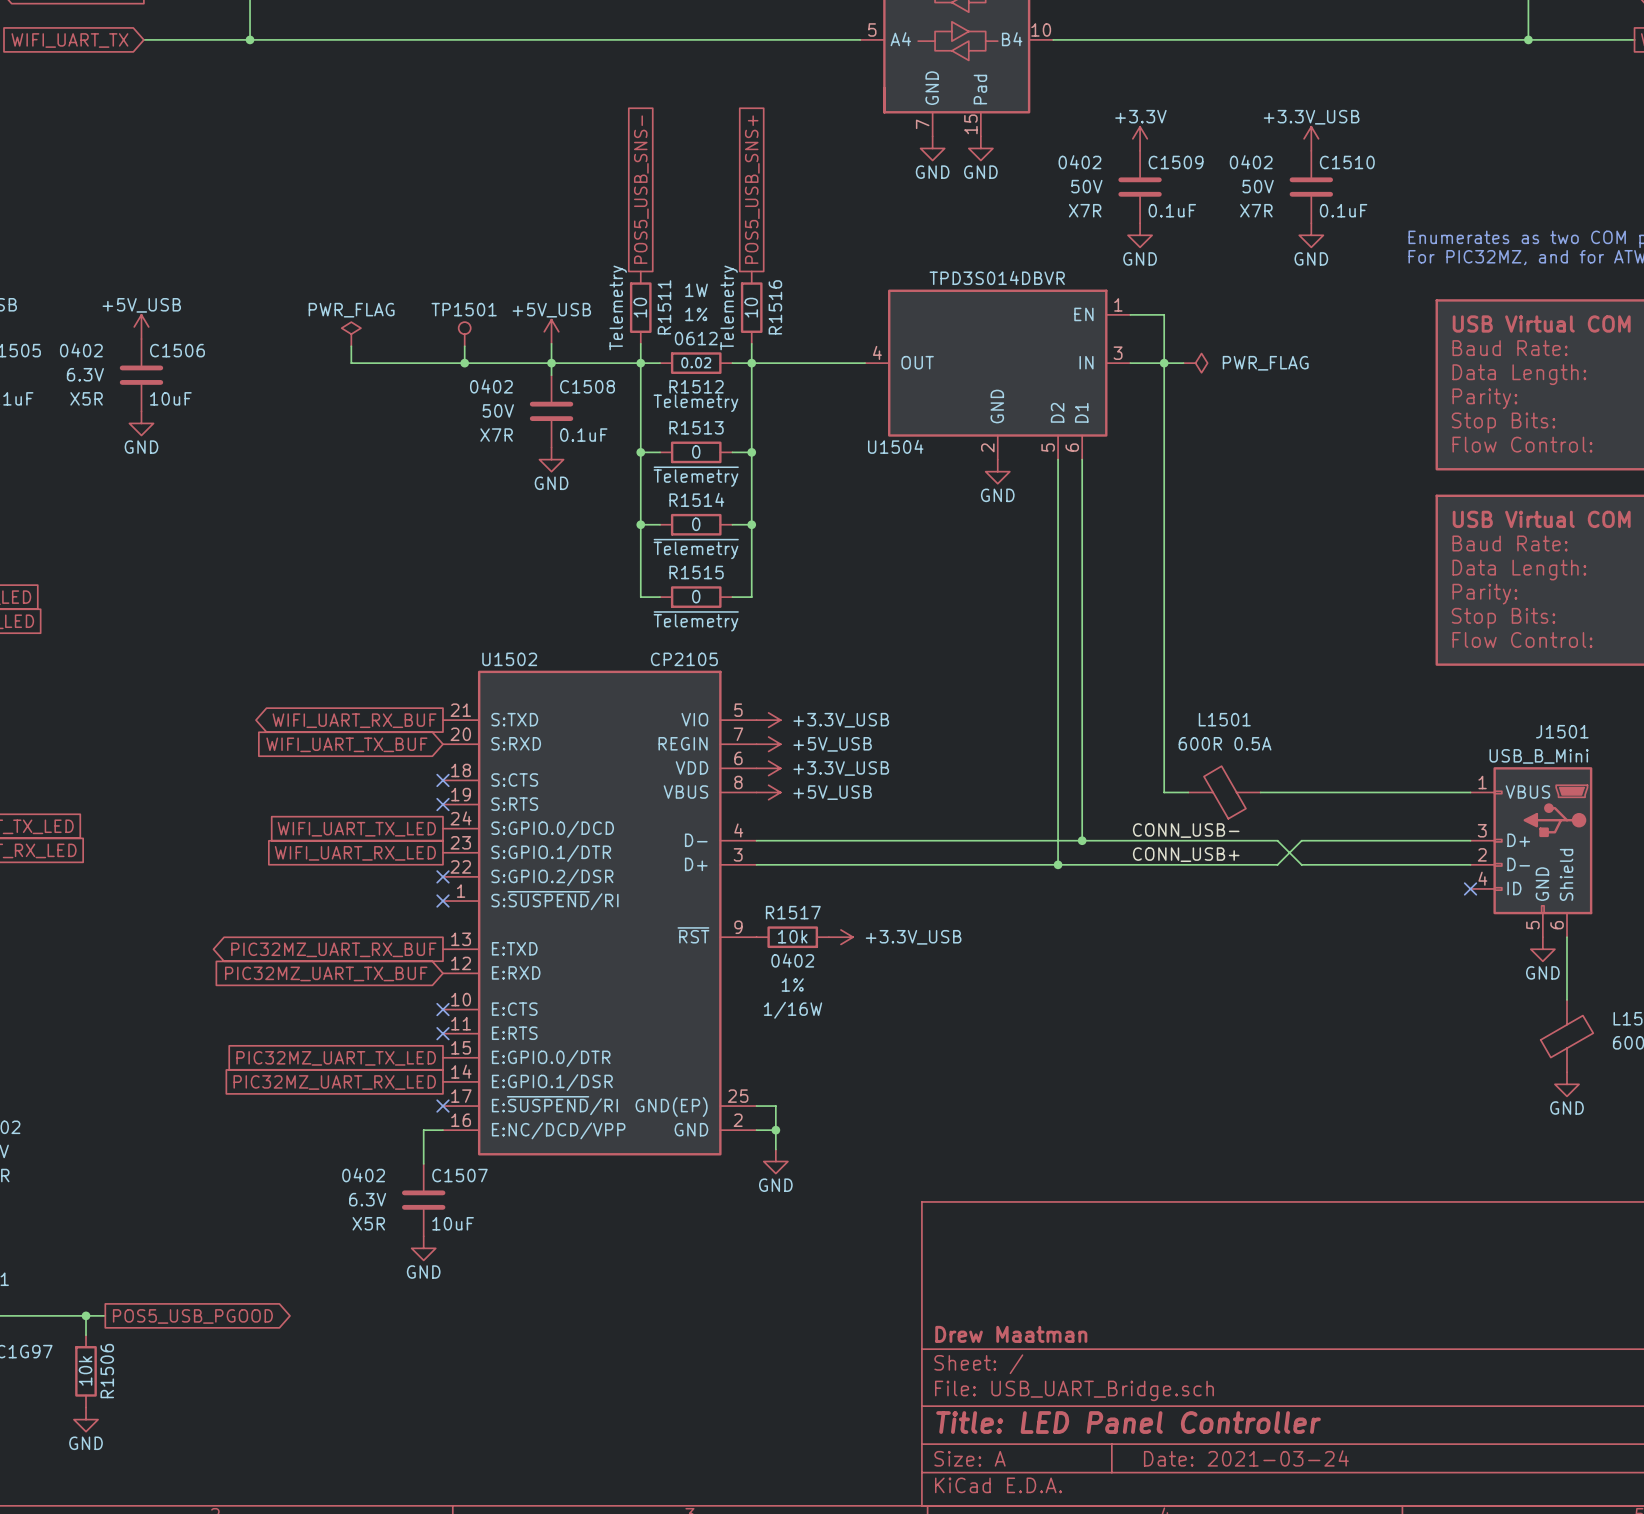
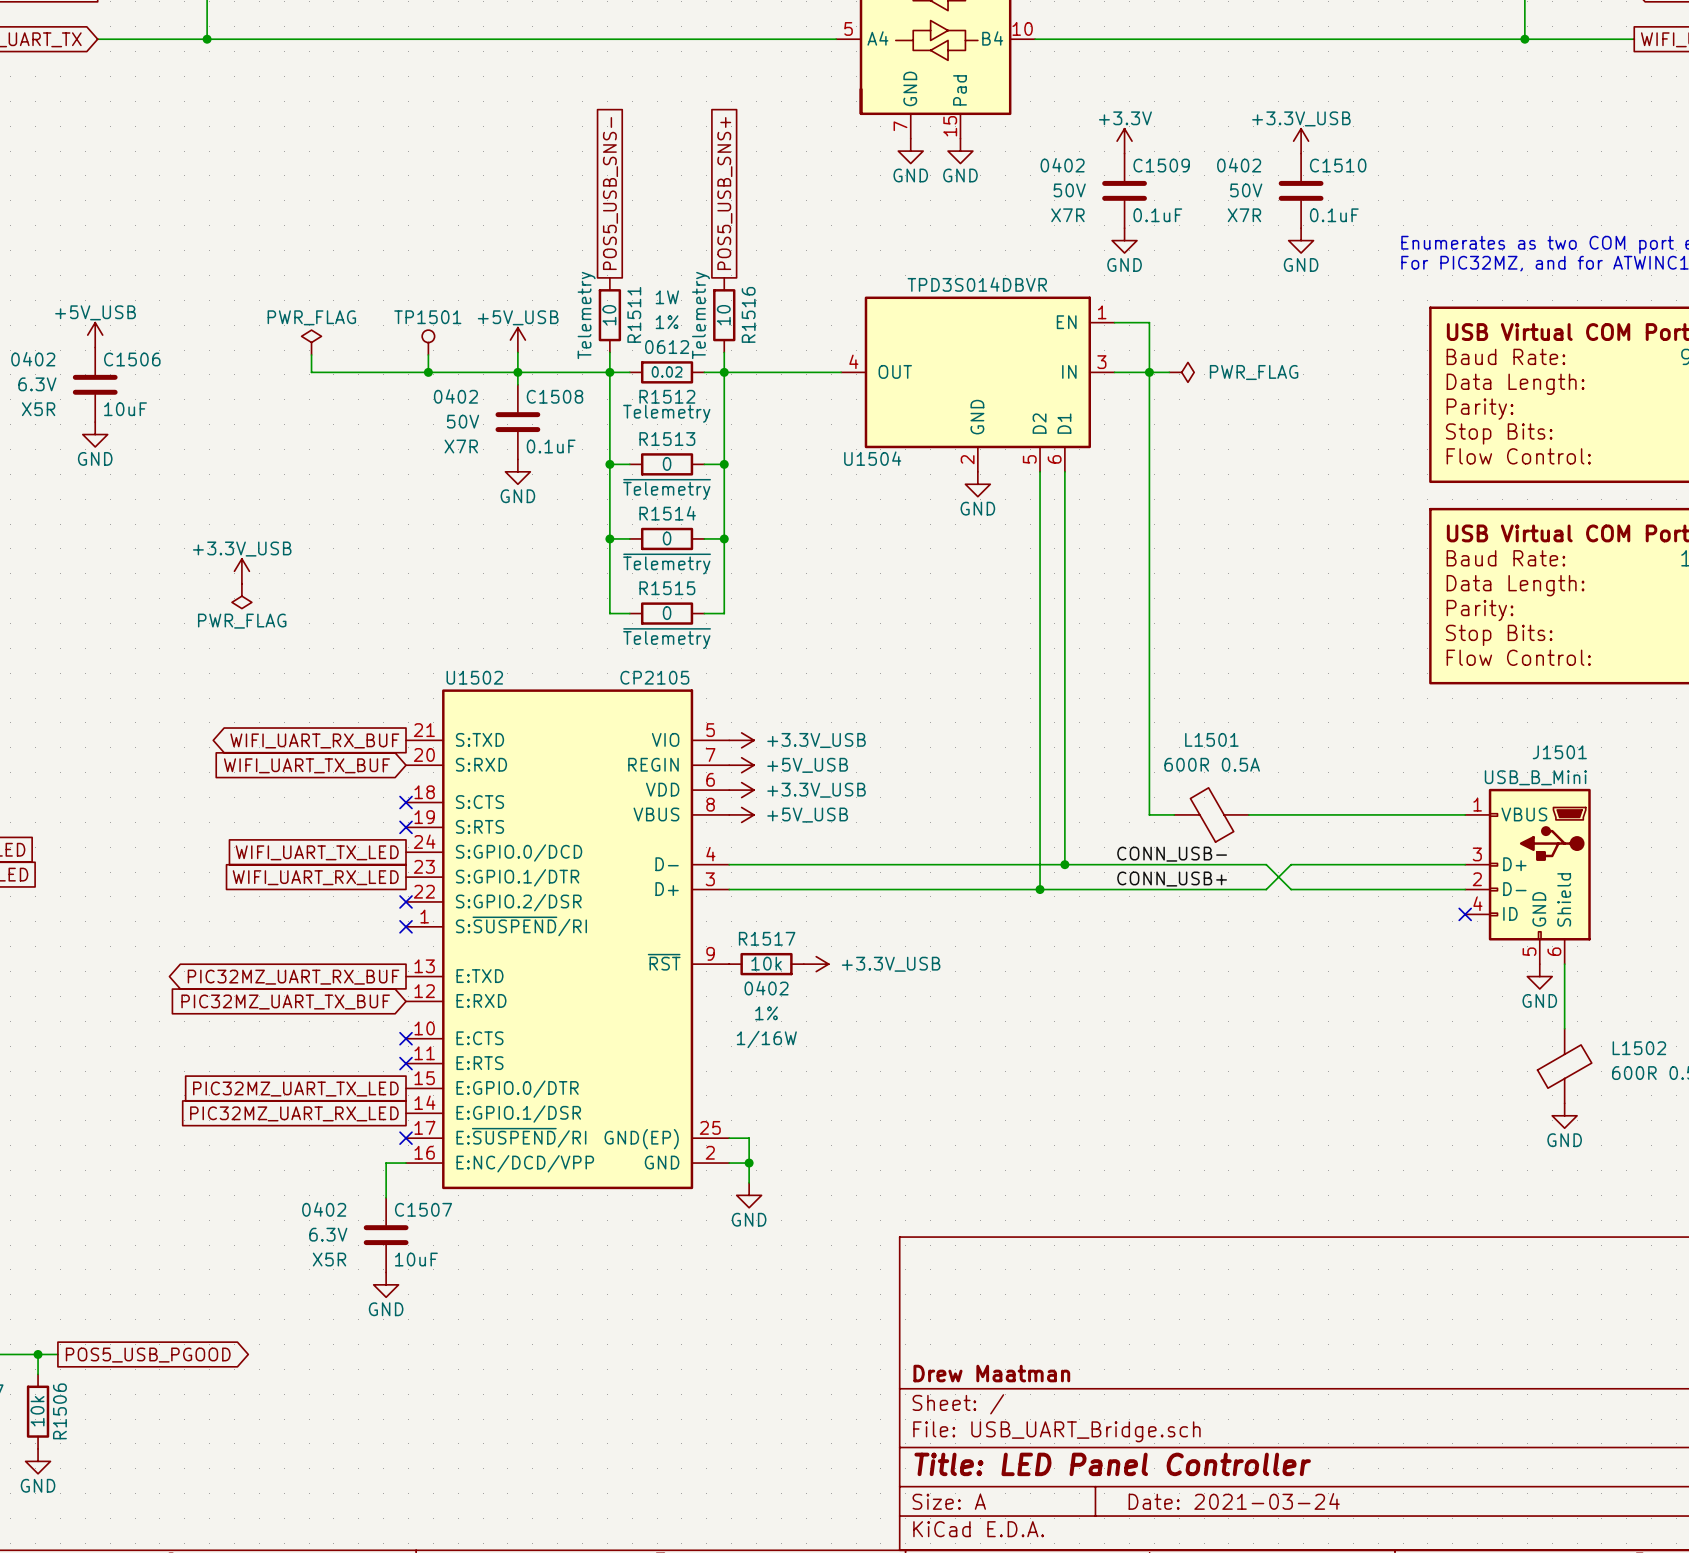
power symbol: none -> +3.3V_USB (241, 571)
power symbol: none -> PWR_FLAG (241, 596)

